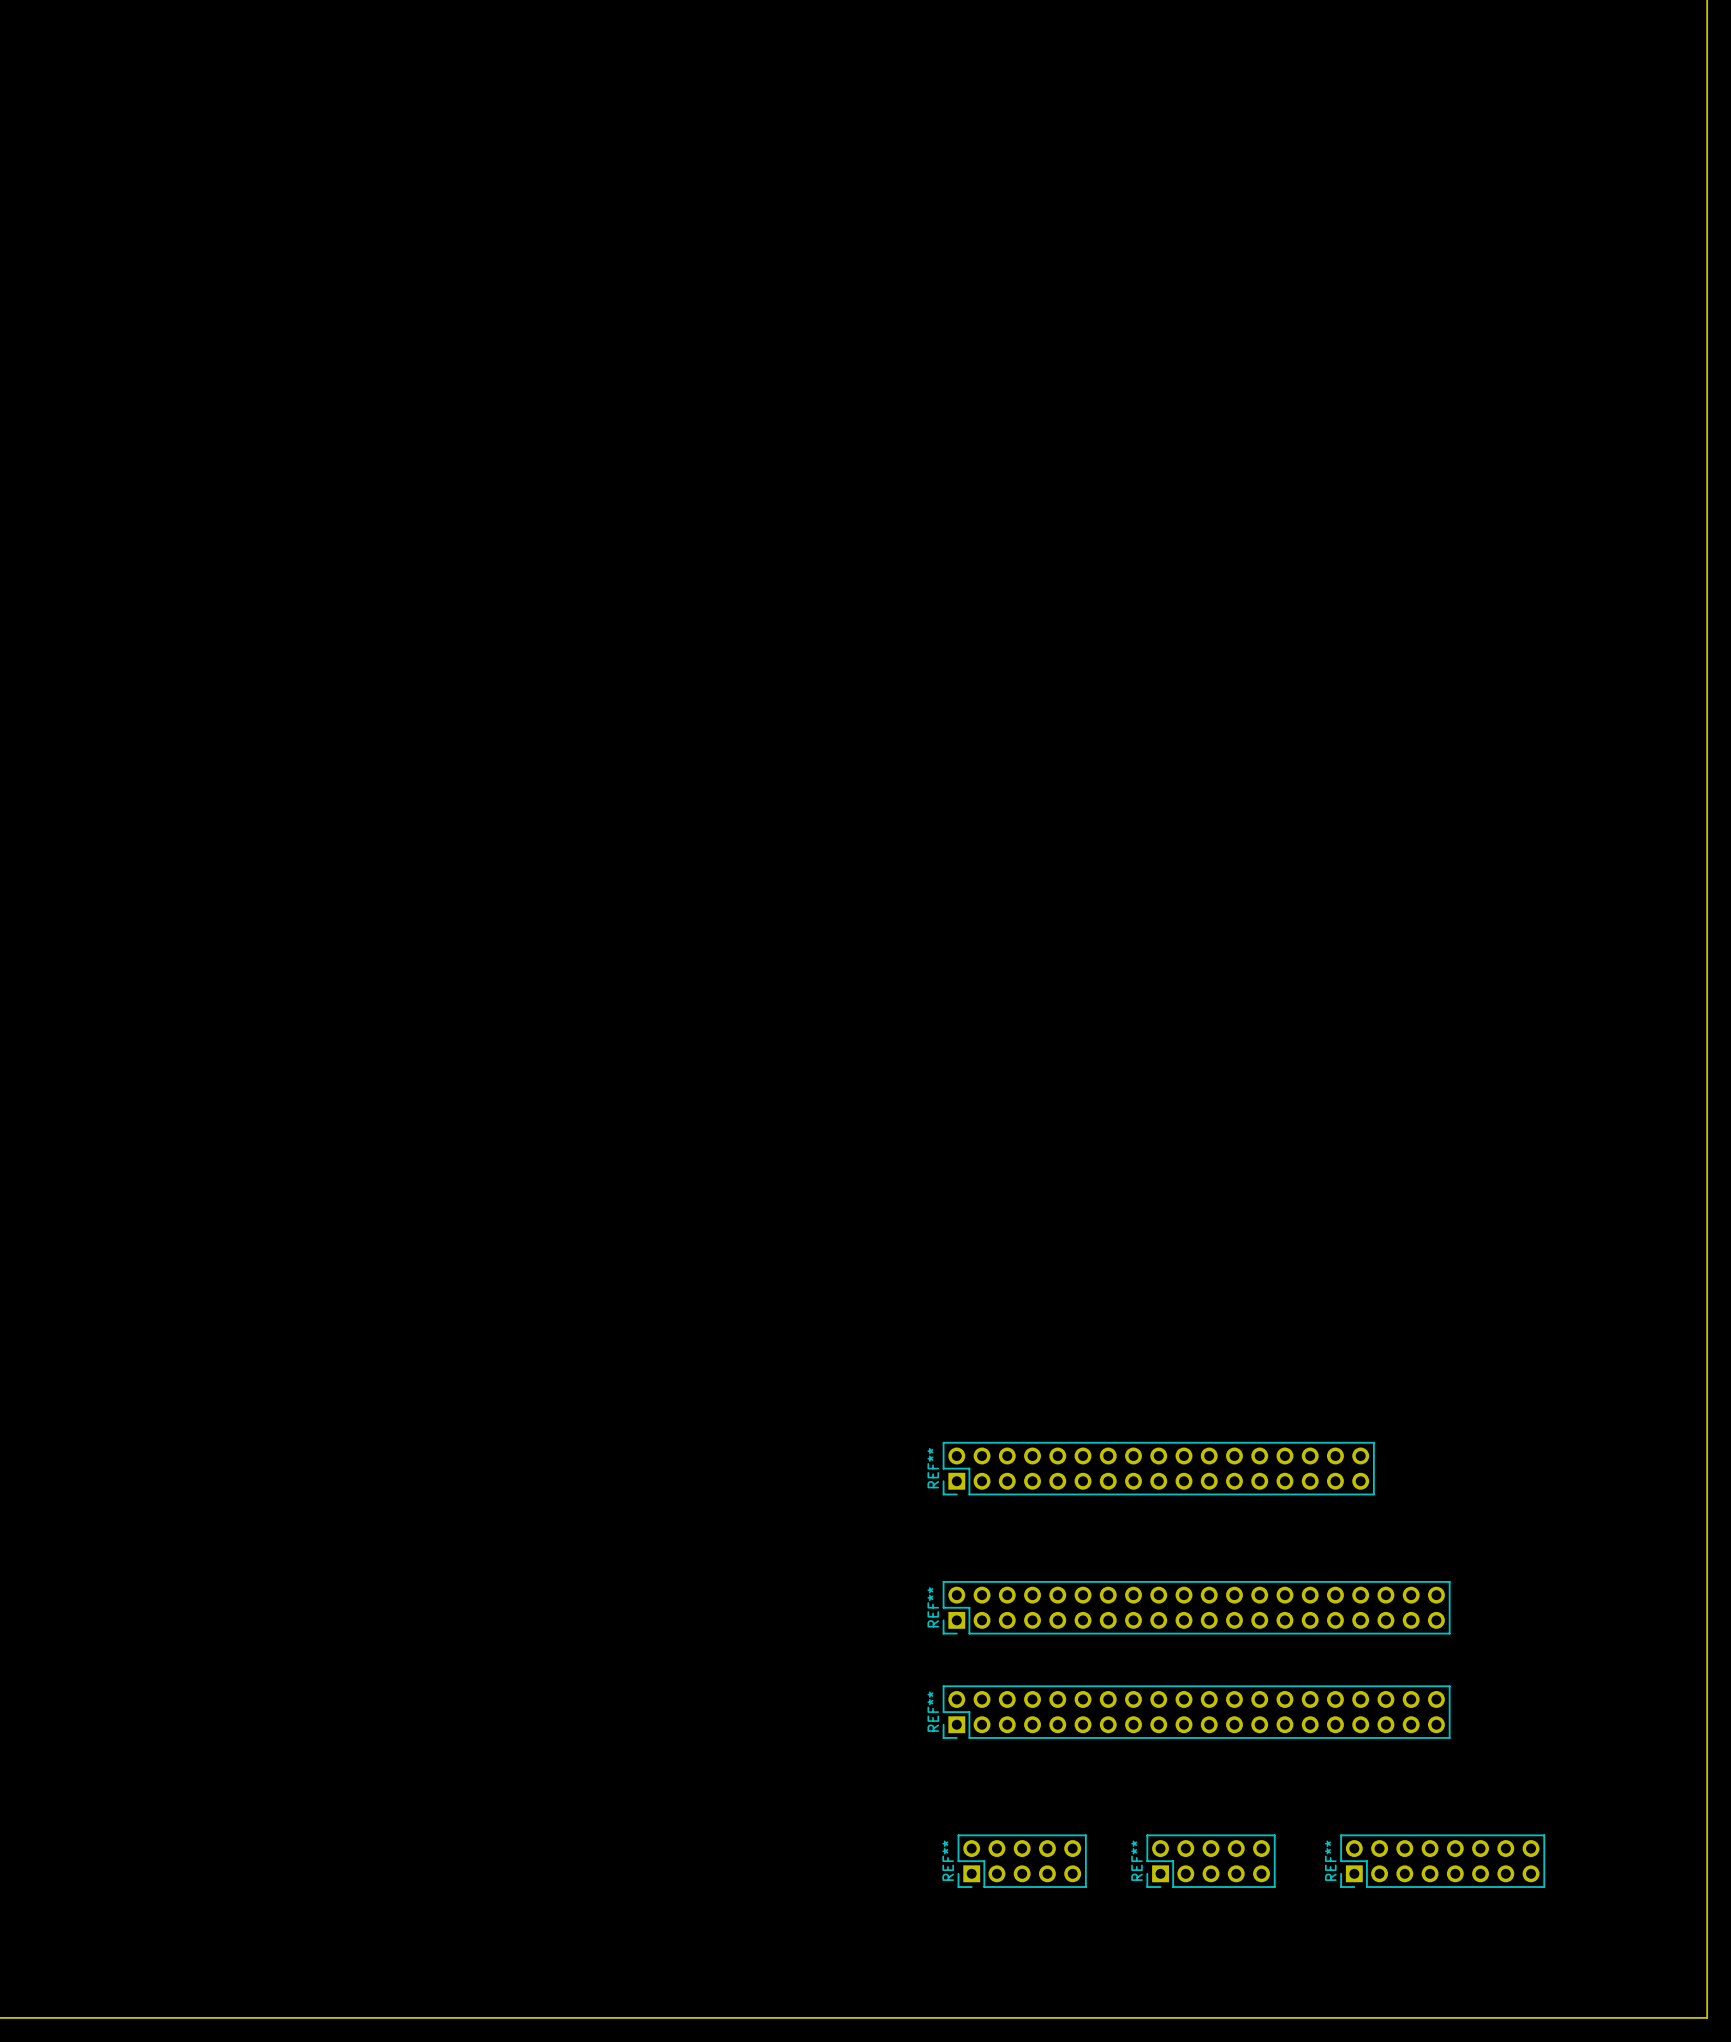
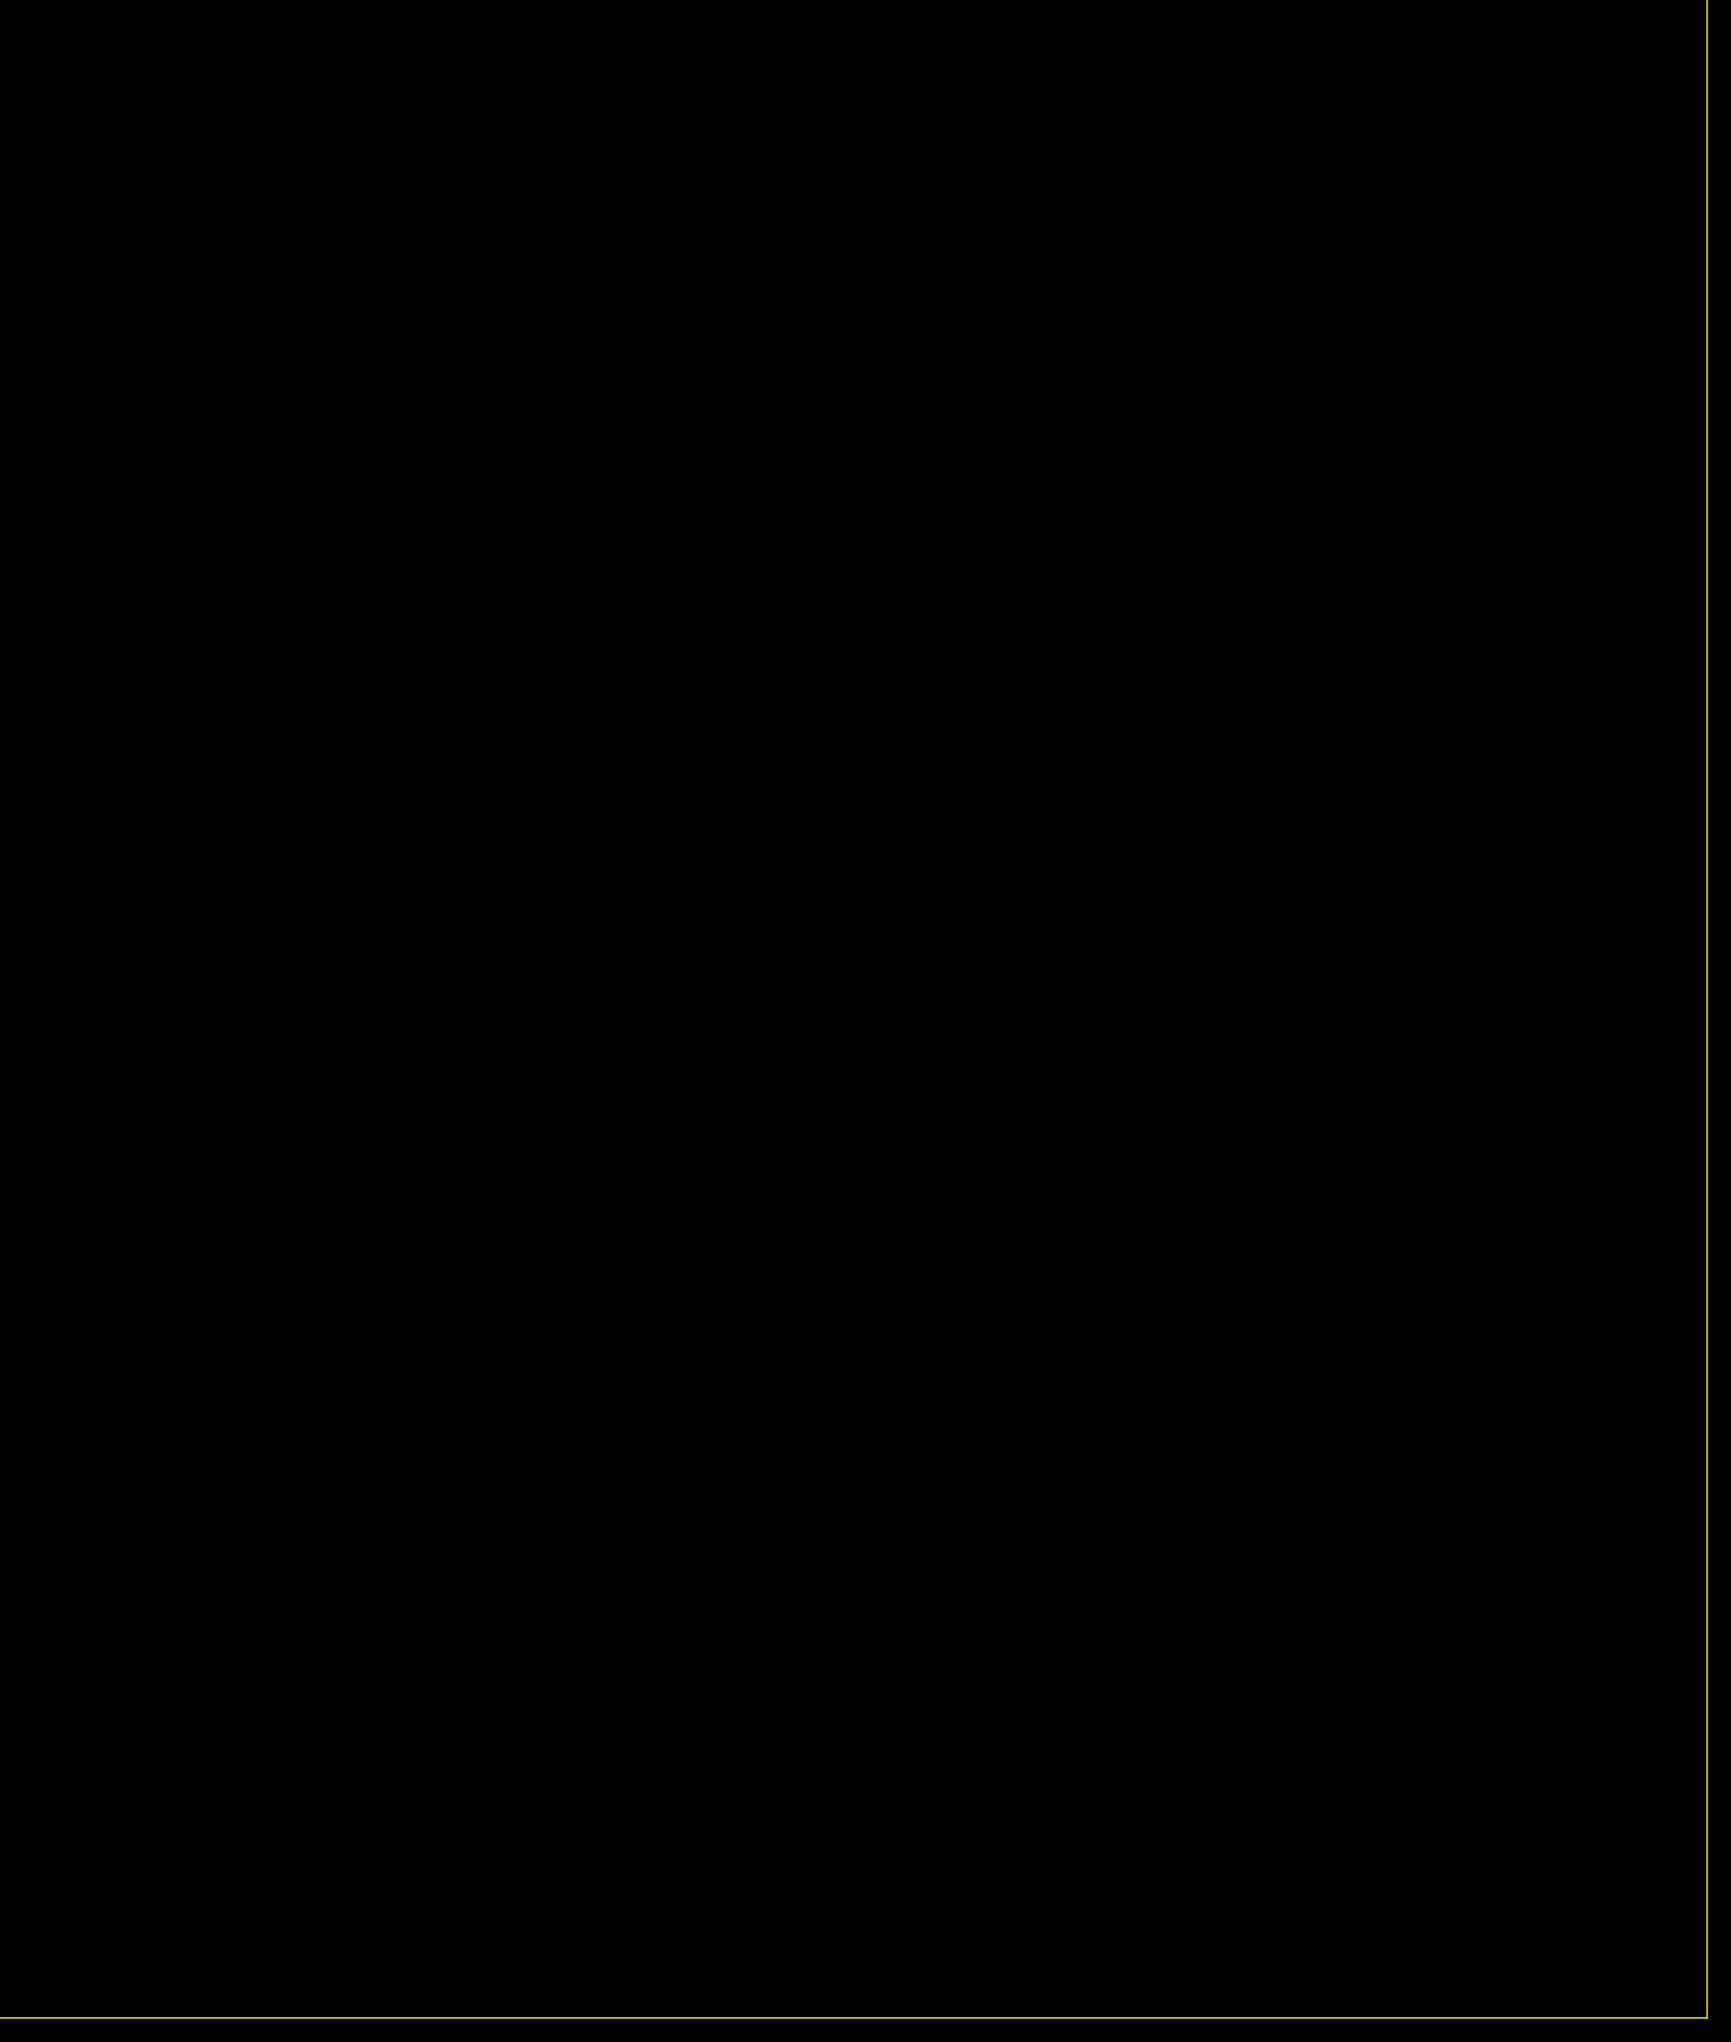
REF**: (1158, 1468) -> none
REF**: (1196, 1607) -> none
REF**: (1196, 1712) -> none
REF**: (1022, 1861) -> none
REF**: (1211, 1861) -> none
REF**: (1442, 1861) -> none

